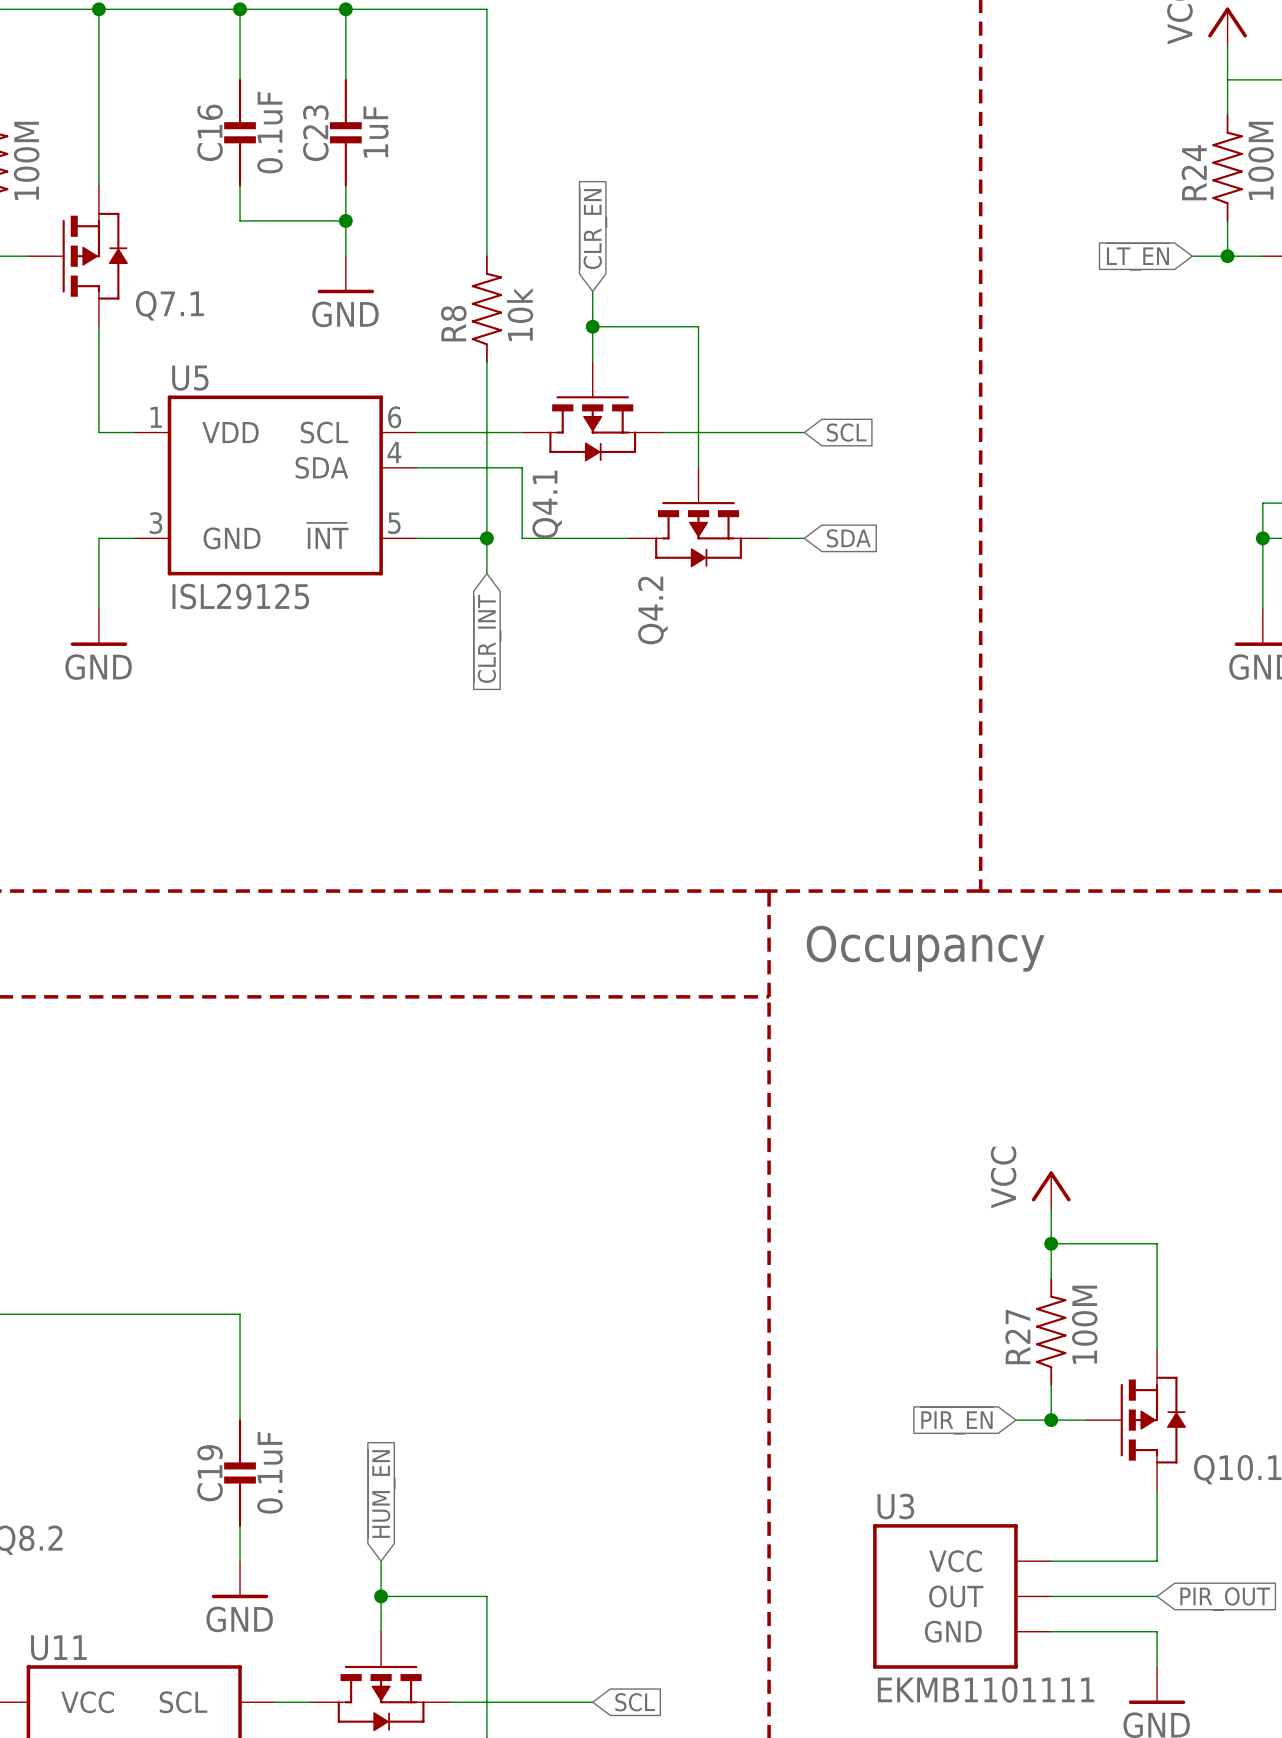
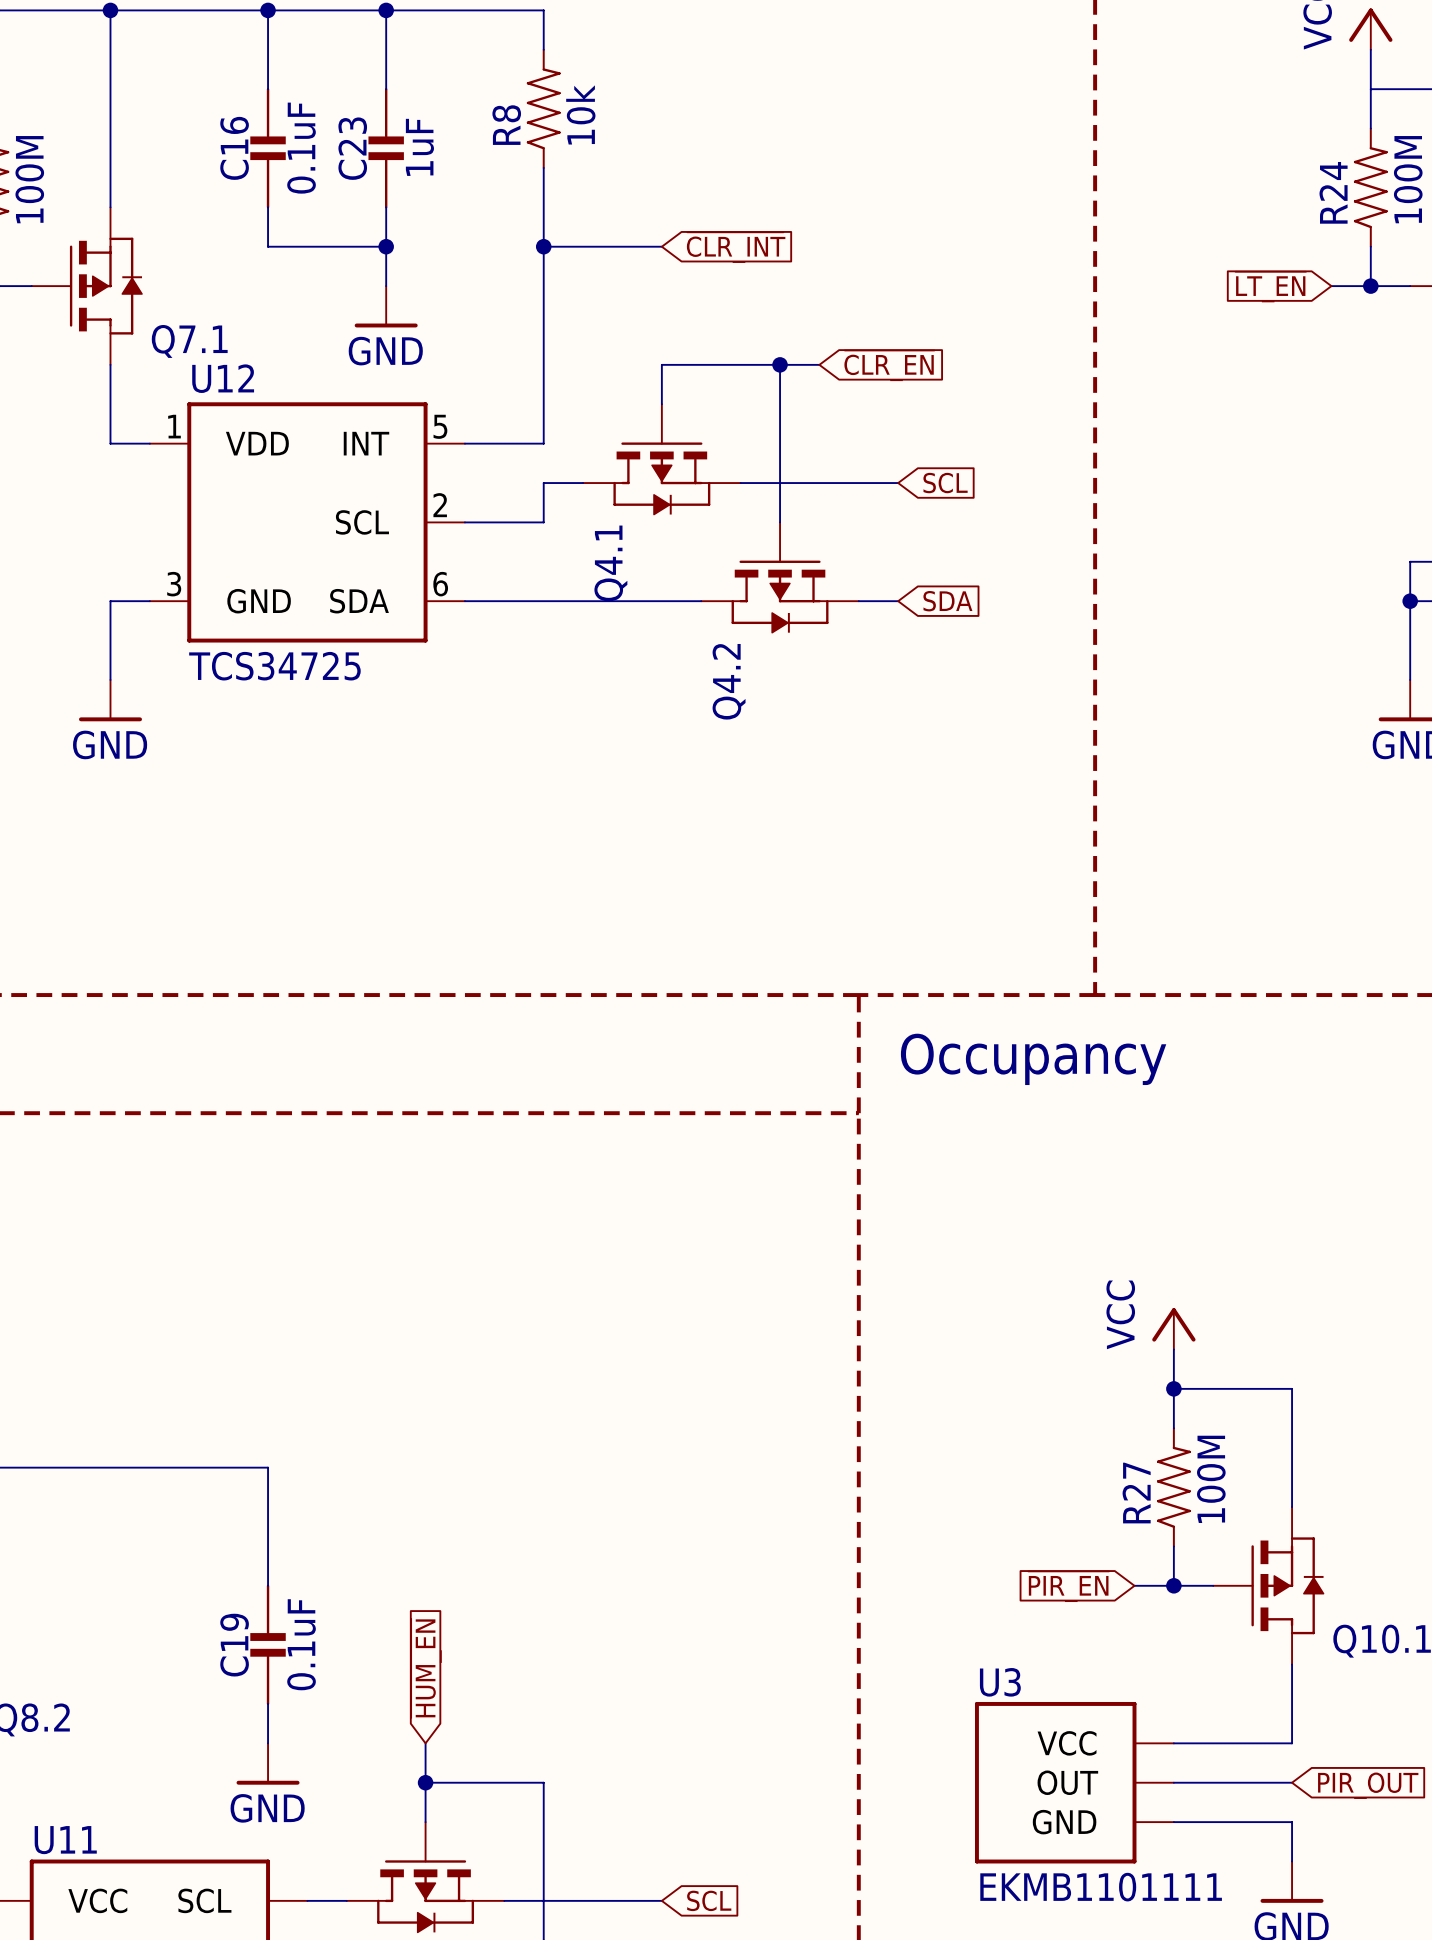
wire: none -> (543, 246) (661, 246)
junction: none -> (543, 246)
global label: none -> ~{CLR_INT} (736, 247)
global label rotation: 0° (593, 228) -> 90° clockwise (889, 365)
global label position: ~{CLR_EN} (593, 228) -> ~{CLR_EN} (889, 365)
wire: (592, 291) (592, 326) -> none
R8 position: (486, 309) -> (543, 108)
junction: (592, 326) -> none
wire: none -> (780, 364) (819, 364)
junction: none -> (780, 364)
wire: (98, 397) (98, 432) (134, 432) -> (110, 443) (149, 443)
wire: (486, 397) (486, 432) (416, 432) -> (543, 443) (464, 443)
U12: none -> TCS34725 (307, 522)
U5: ISL29125 (275, 485) -> none
junction: (486, 538) -> none
wire: (522, 538) (522, 467) (486, 467) (486, 573) -> (583, 601) (543, 601)
global label: ~{CLR_INT} (487, 638) -> none

